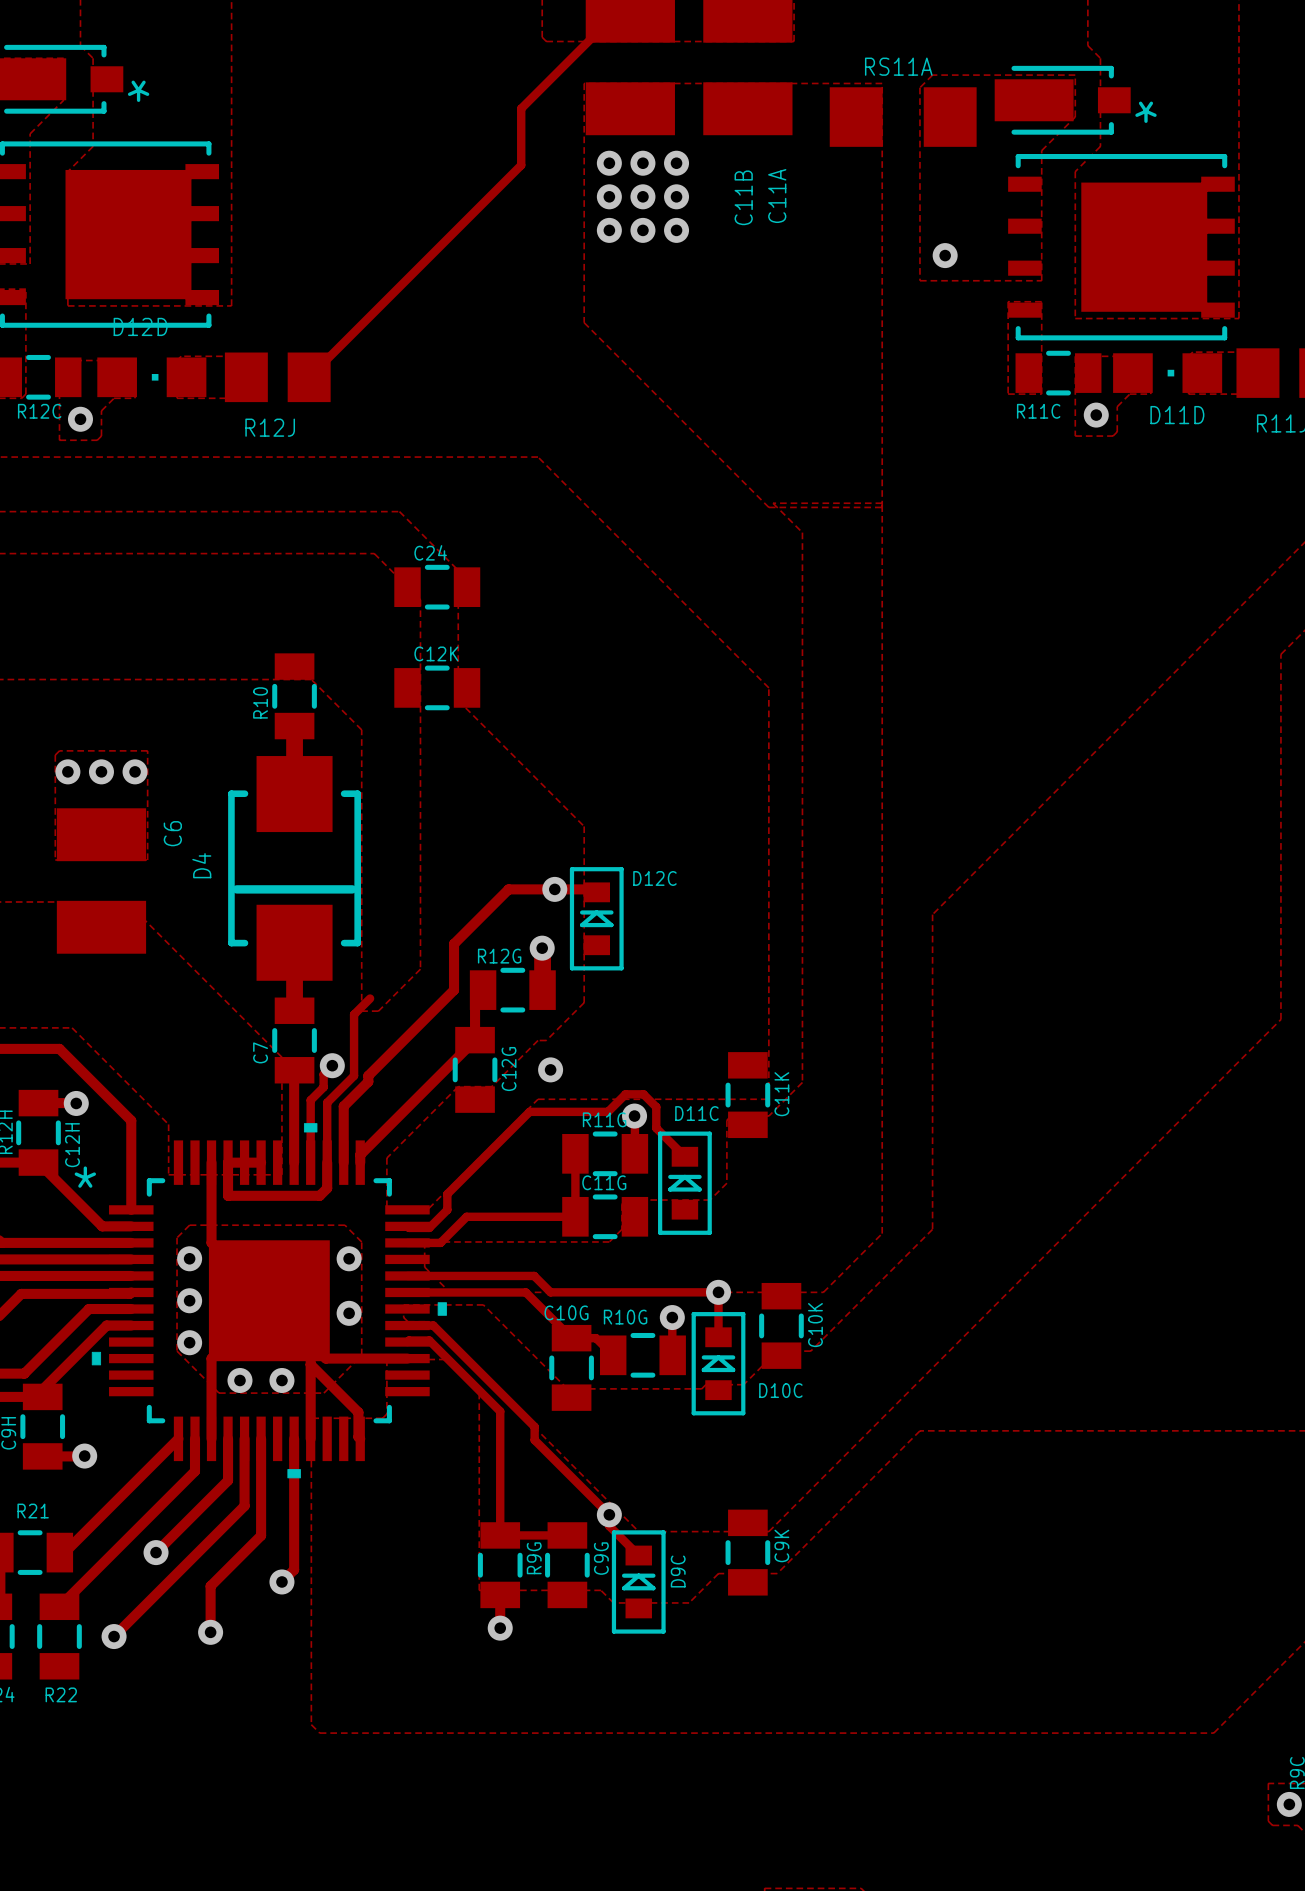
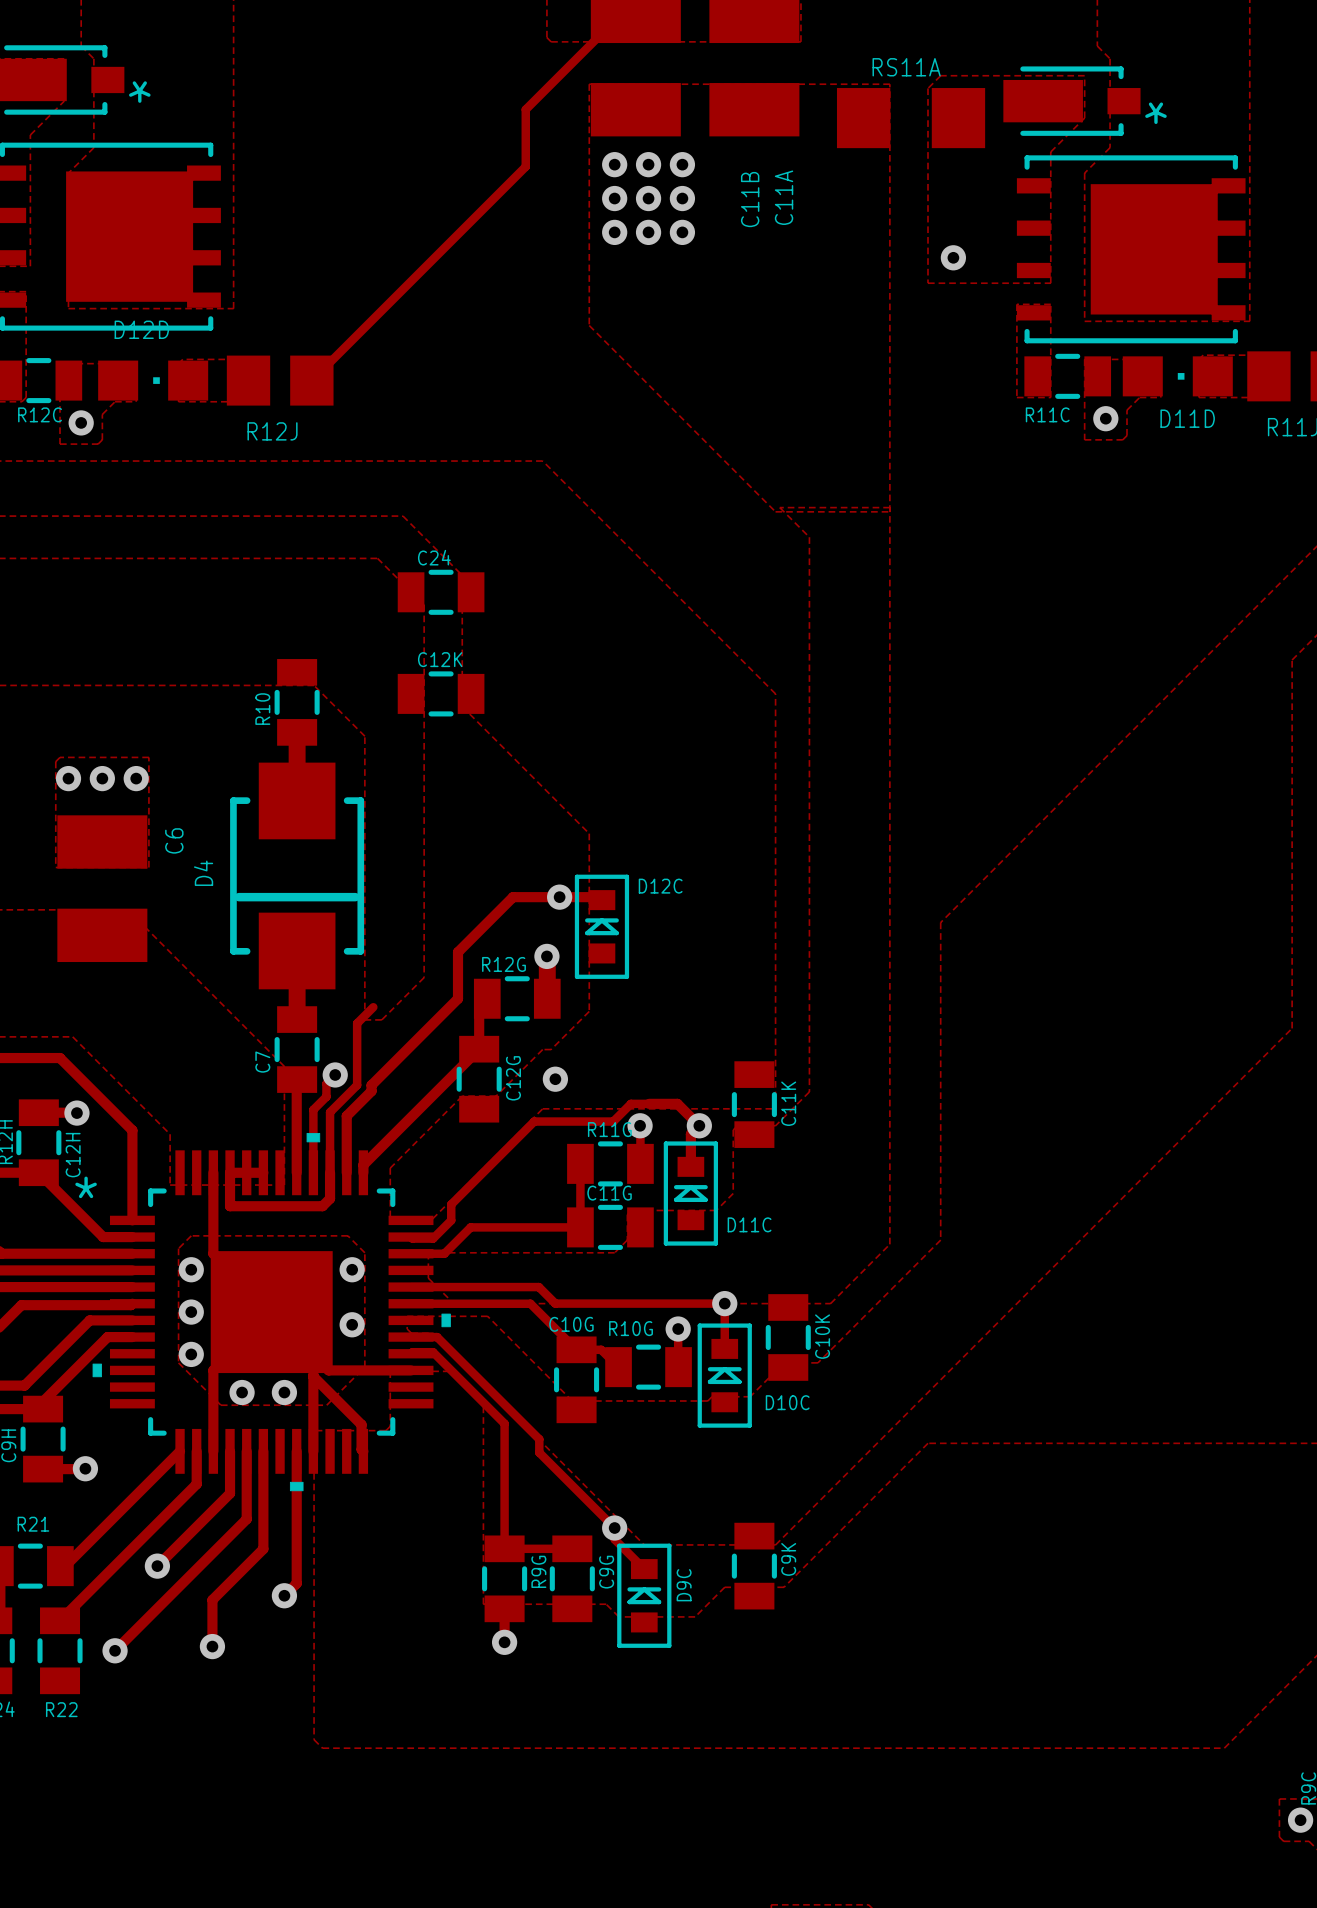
track: (643, 1094) (656, 1107) (656, 1128) (684, 1156) -> (649, 1103) (677, 1103) (699, 1125) (690, 1134) (690, 1166)
D11C name position: D11C (696, 1113) -> D11C (749, 1224)
via: none -> (699, 1125)

